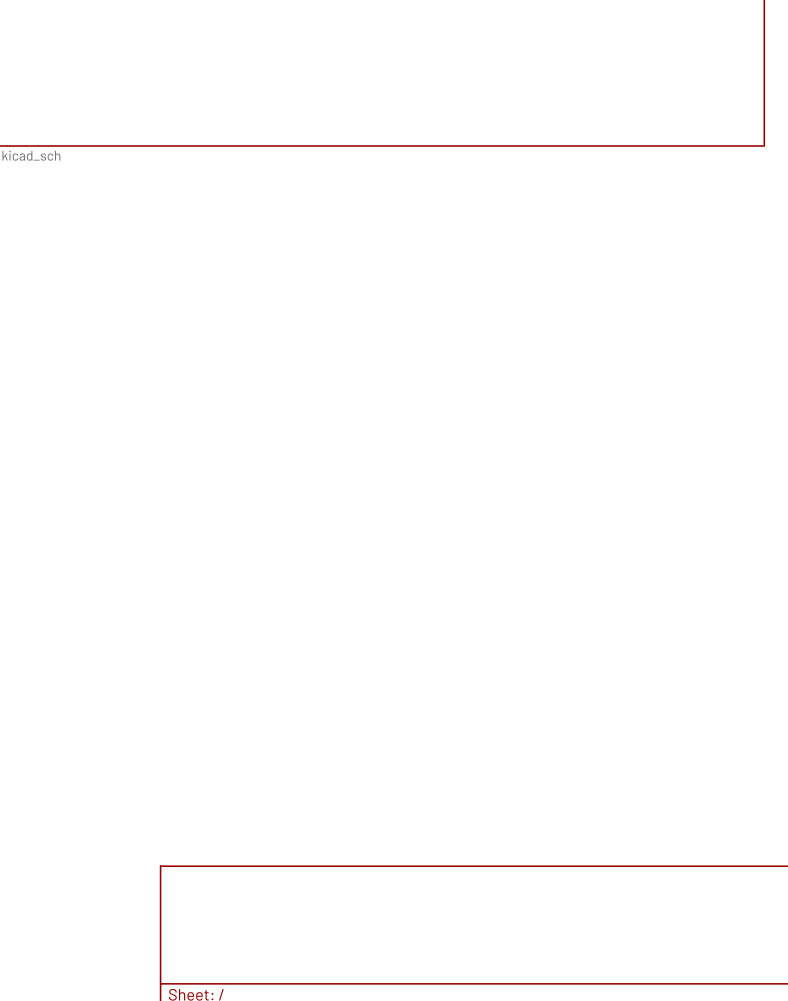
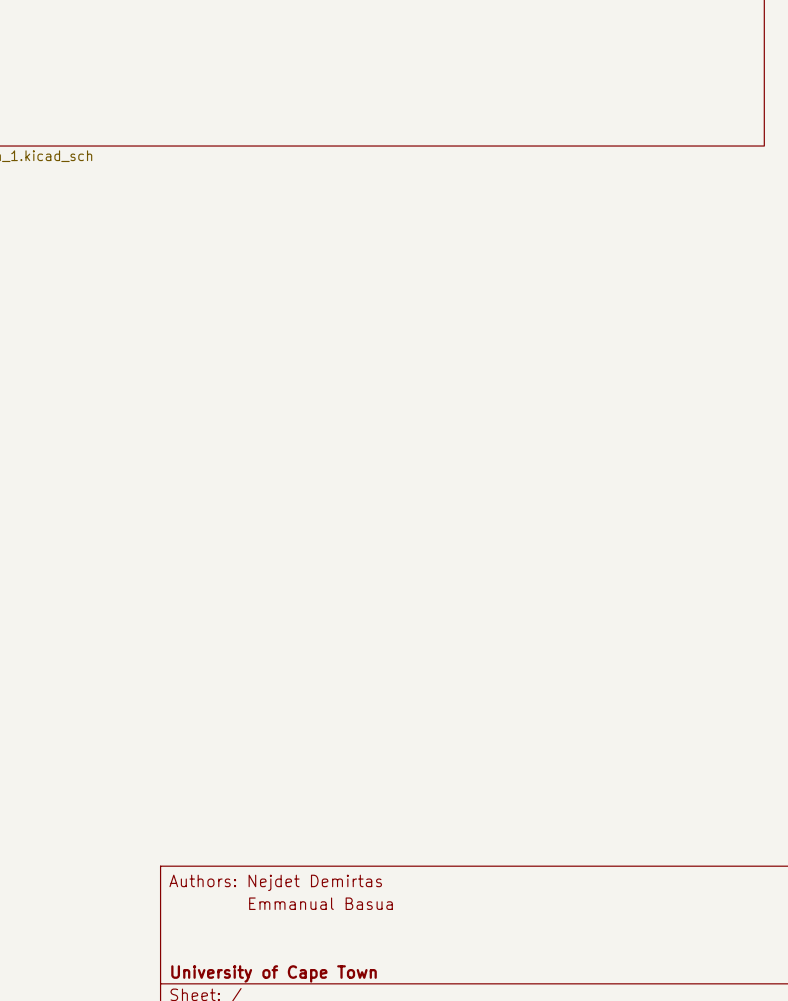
title block: none -> Authors: Nejdet Demirtas (275, 882)
title block: none -> Emmanual Basua (321, 903)
title block: none -> University of Cape Town (274, 973)

